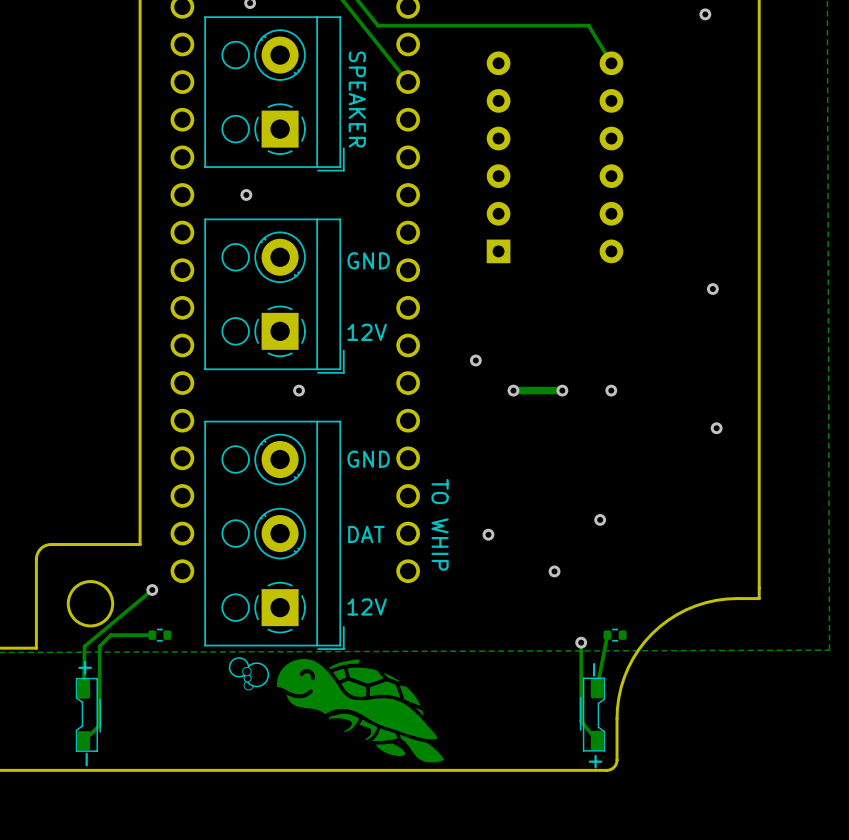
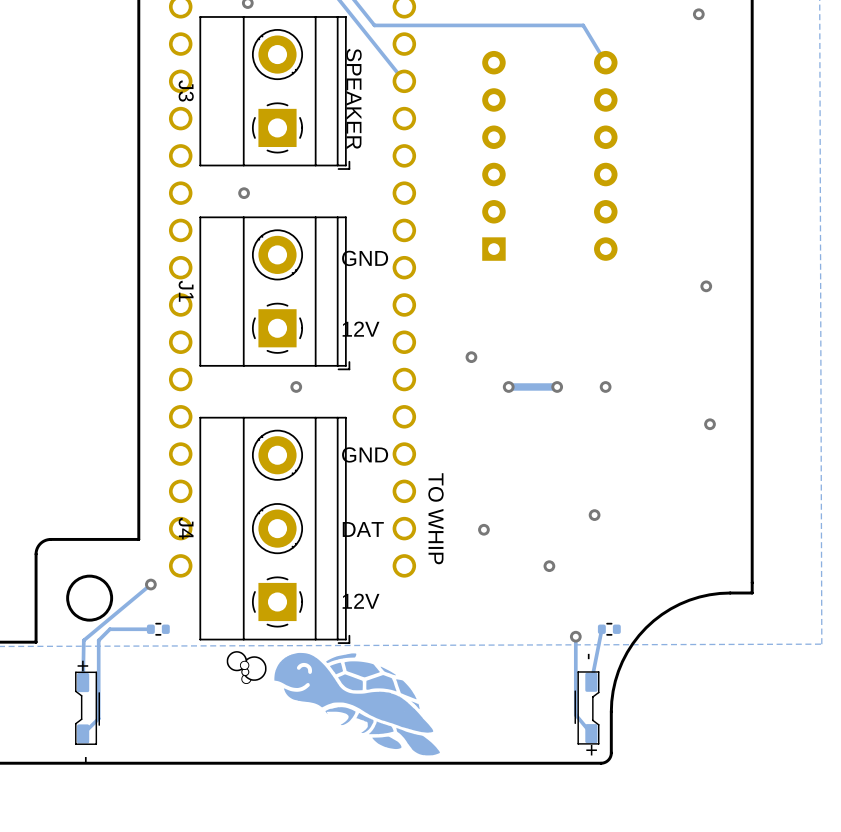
part: (274, 93) -> none
J3: none -> (274, 93)
part: (274, 296) -> none
J1: none -> (274, 293)
part: (274, 535) -> none
J4: none -> (274, 530)

